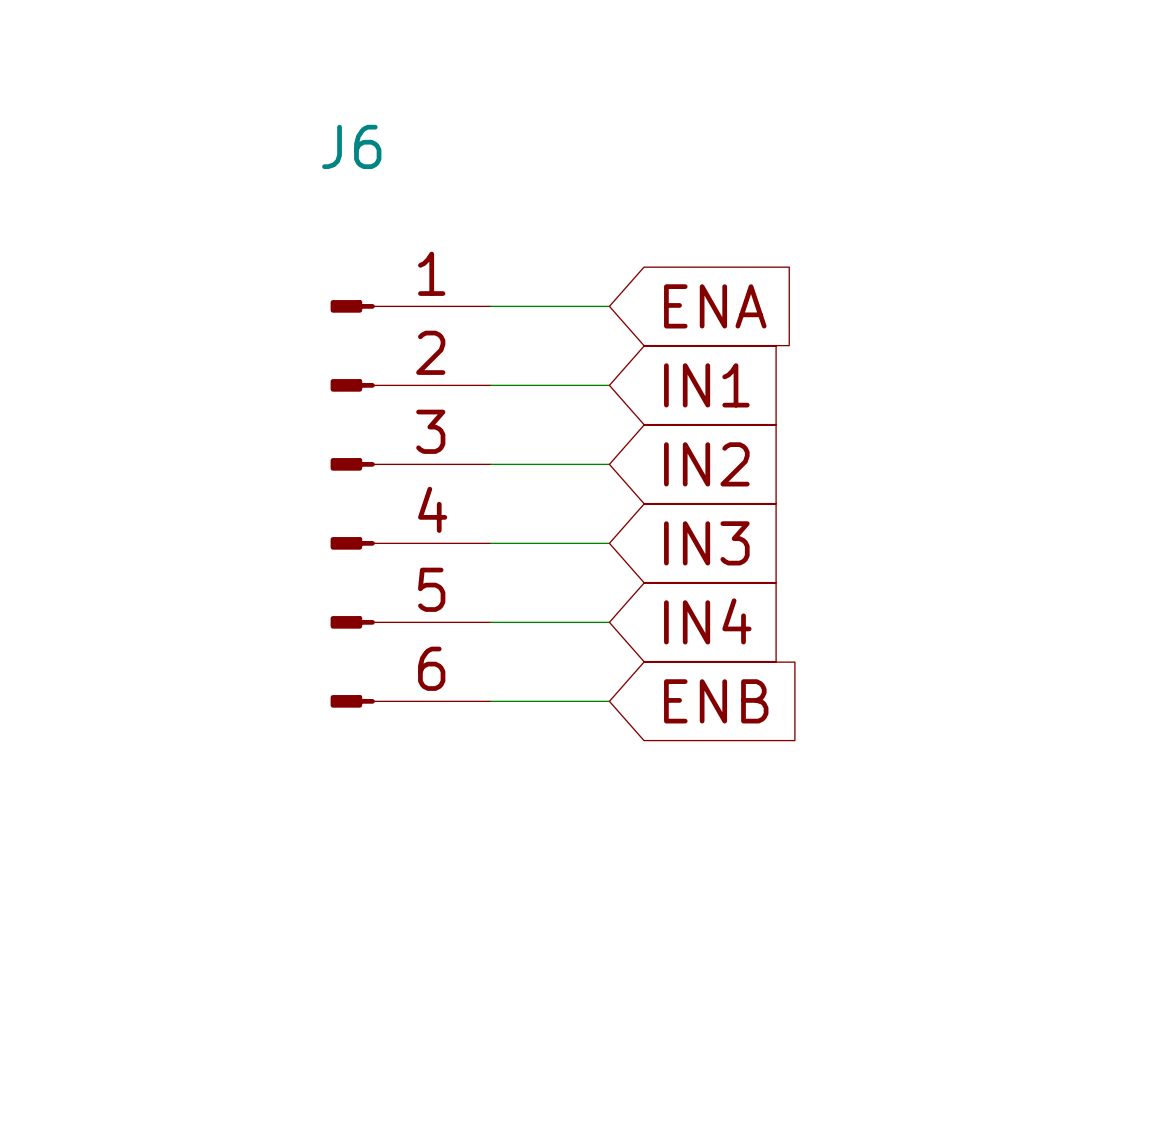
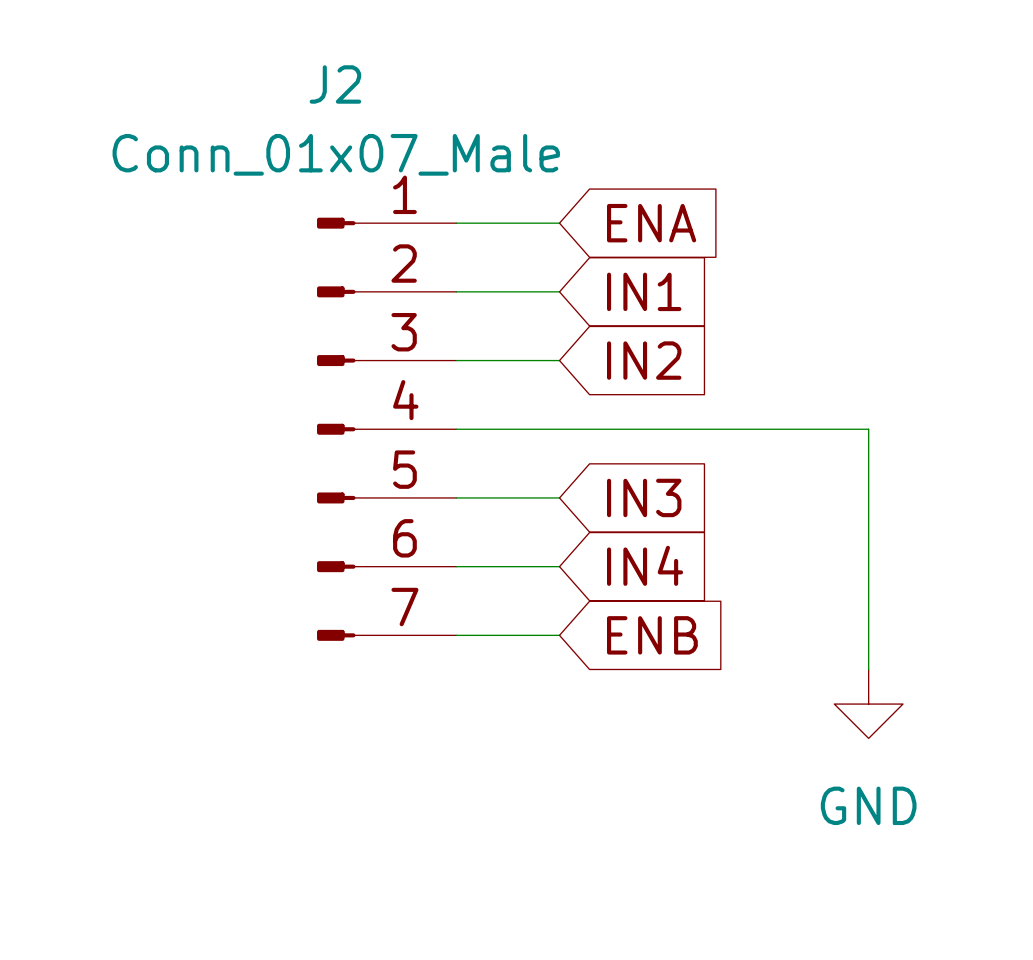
J6: (410, 503) -> none
J2: none -> Conn_01x07_Male (386, 429)
wire: none -> (559, 429) (868, 429) (868, 669)
global label: IN3 (706, 543) -> none
global label: IN4 (707, 621) -> IN3 (644, 497)
global label: ENB (716, 701) -> IN4 (645, 565)
wire: none -> (456, 635) (559, 635)
global label: none -> ENB (652, 635)
power symbol: none -> GND (868, 704)

